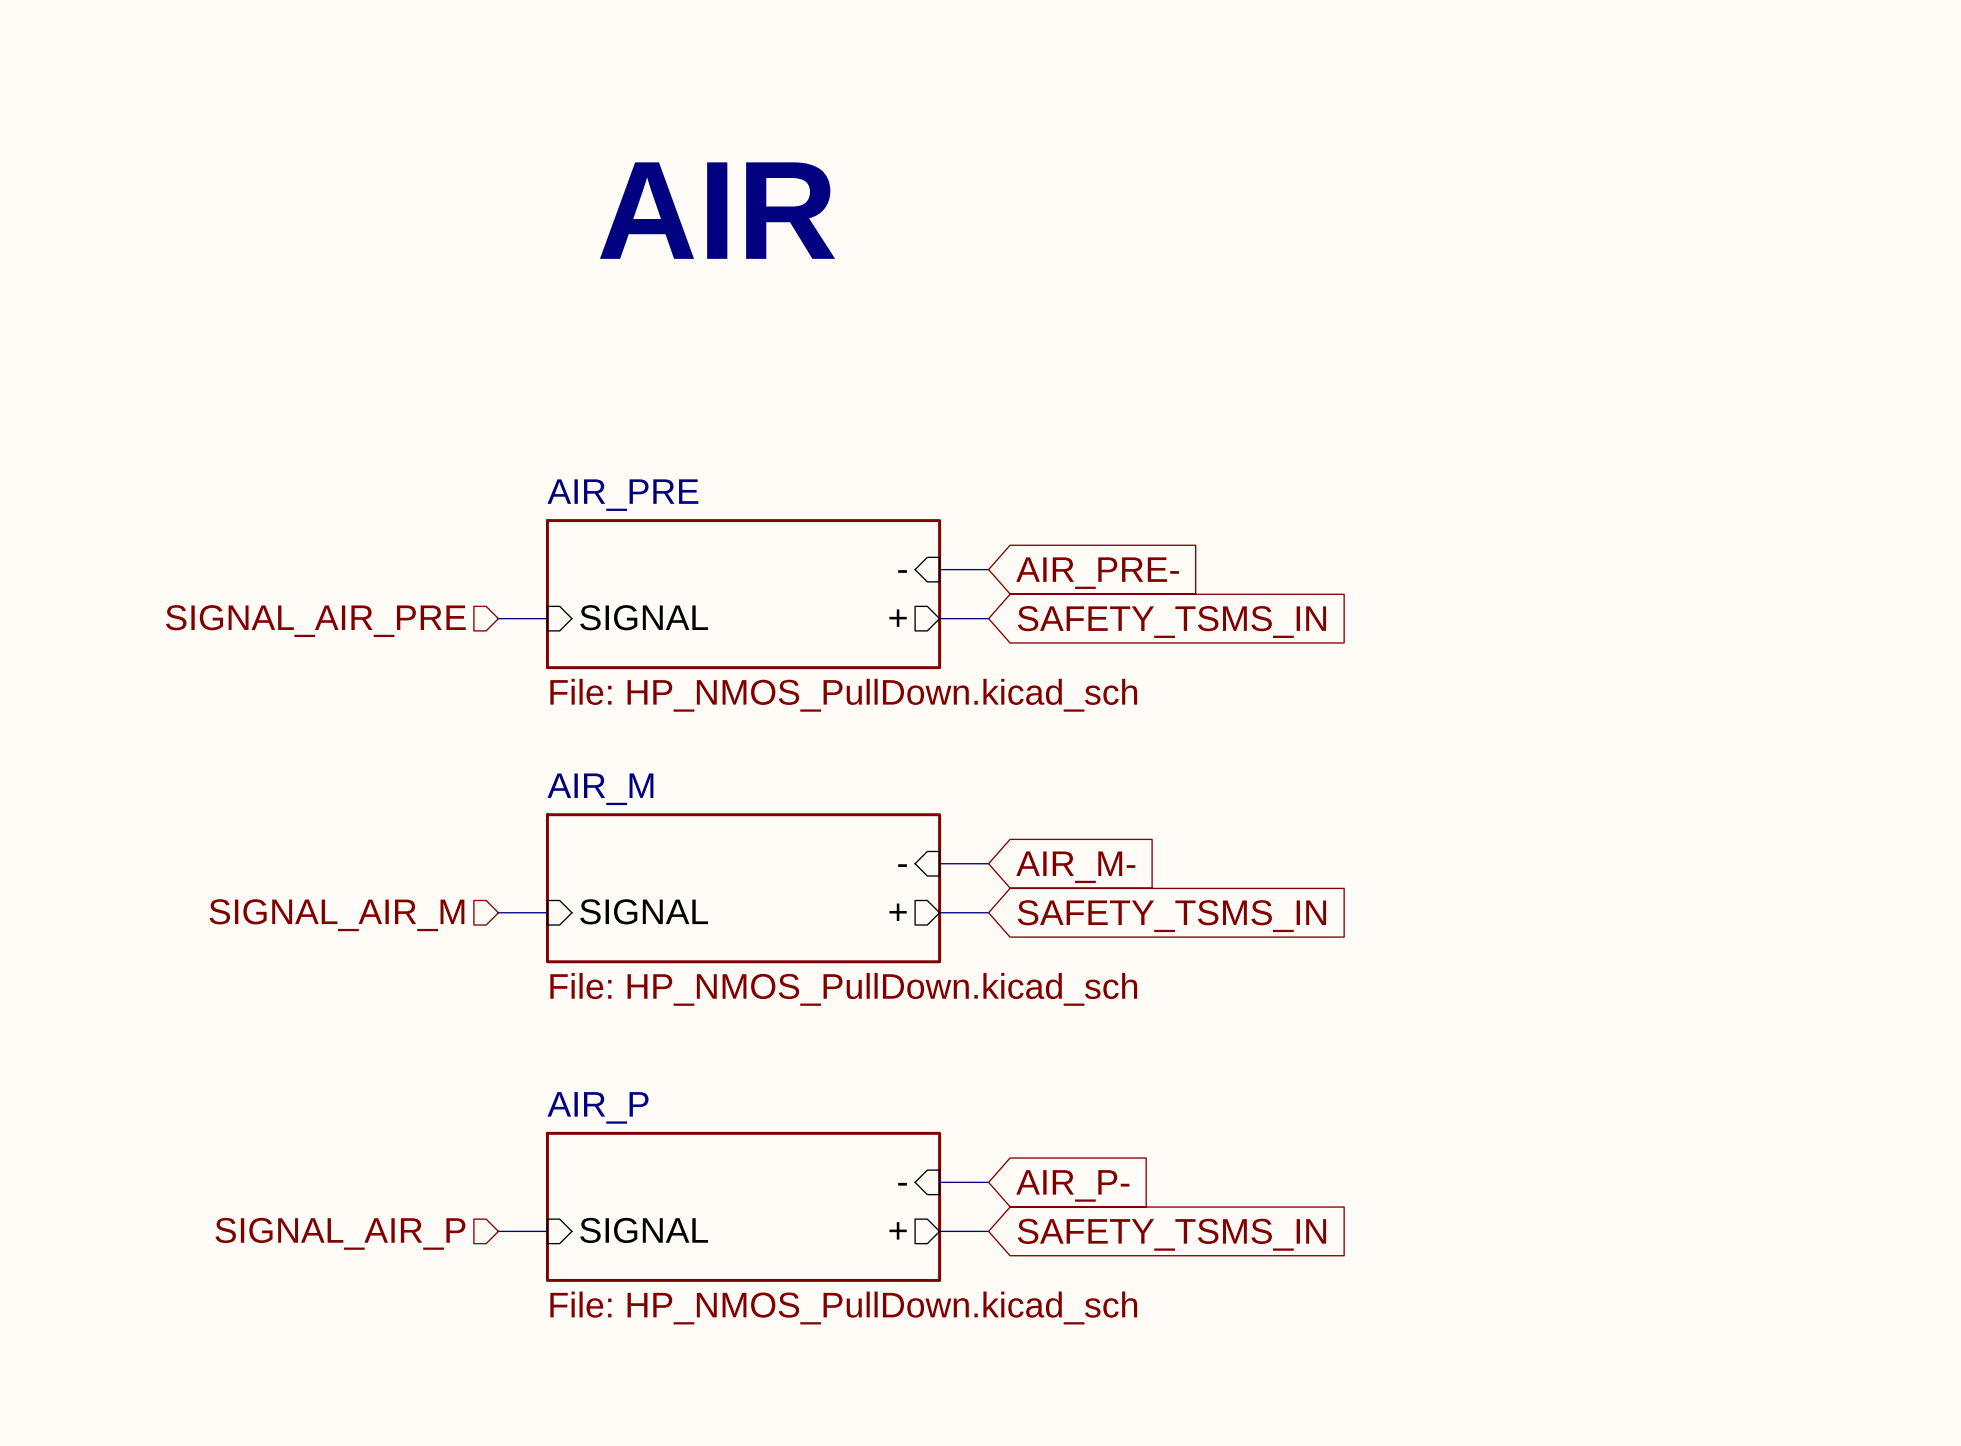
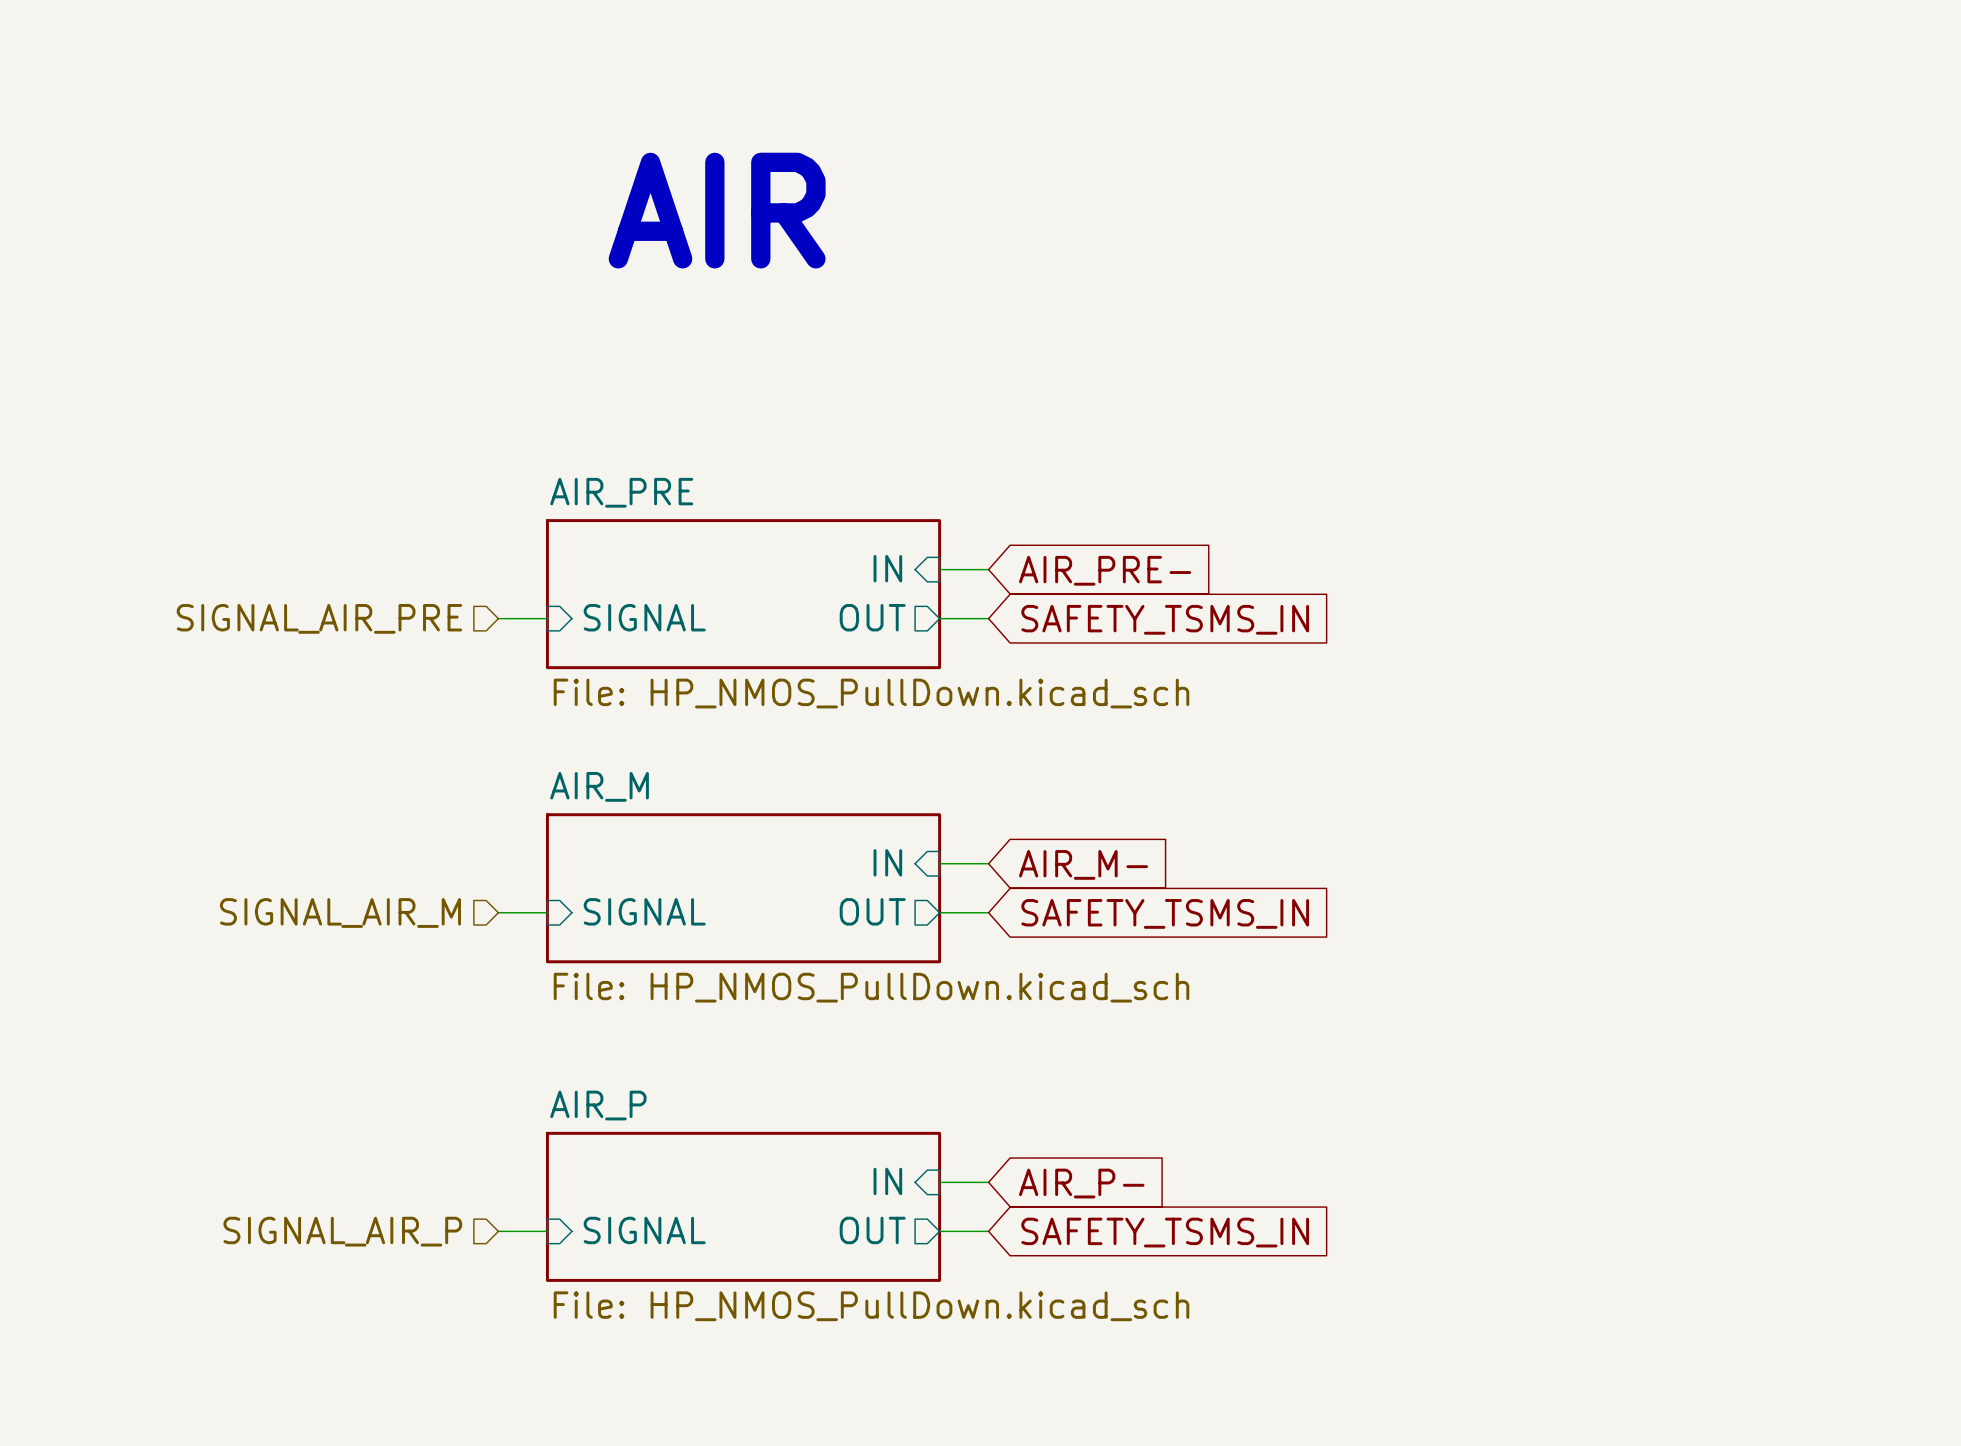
sheet pin: - (902, 571) -> IN (887, 568)
sheet pin: + (898, 618) -> OUT (872, 617)
sheet pin: - (902, 865) -> IN (887, 862)
sheet pin: + (898, 912) -> OUT (872, 911)
sheet pin: - (902, 1184) -> IN (887, 1181)
sheet pin: + (898, 1230) -> OUT (872, 1230)

